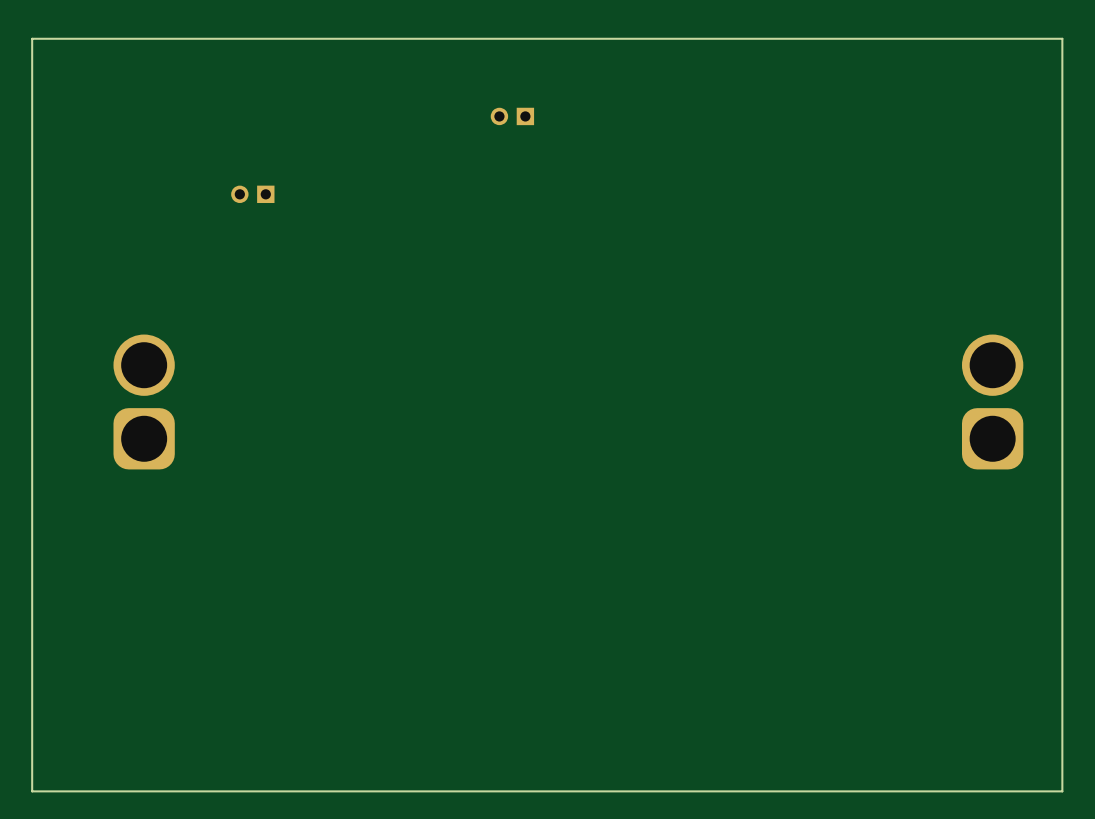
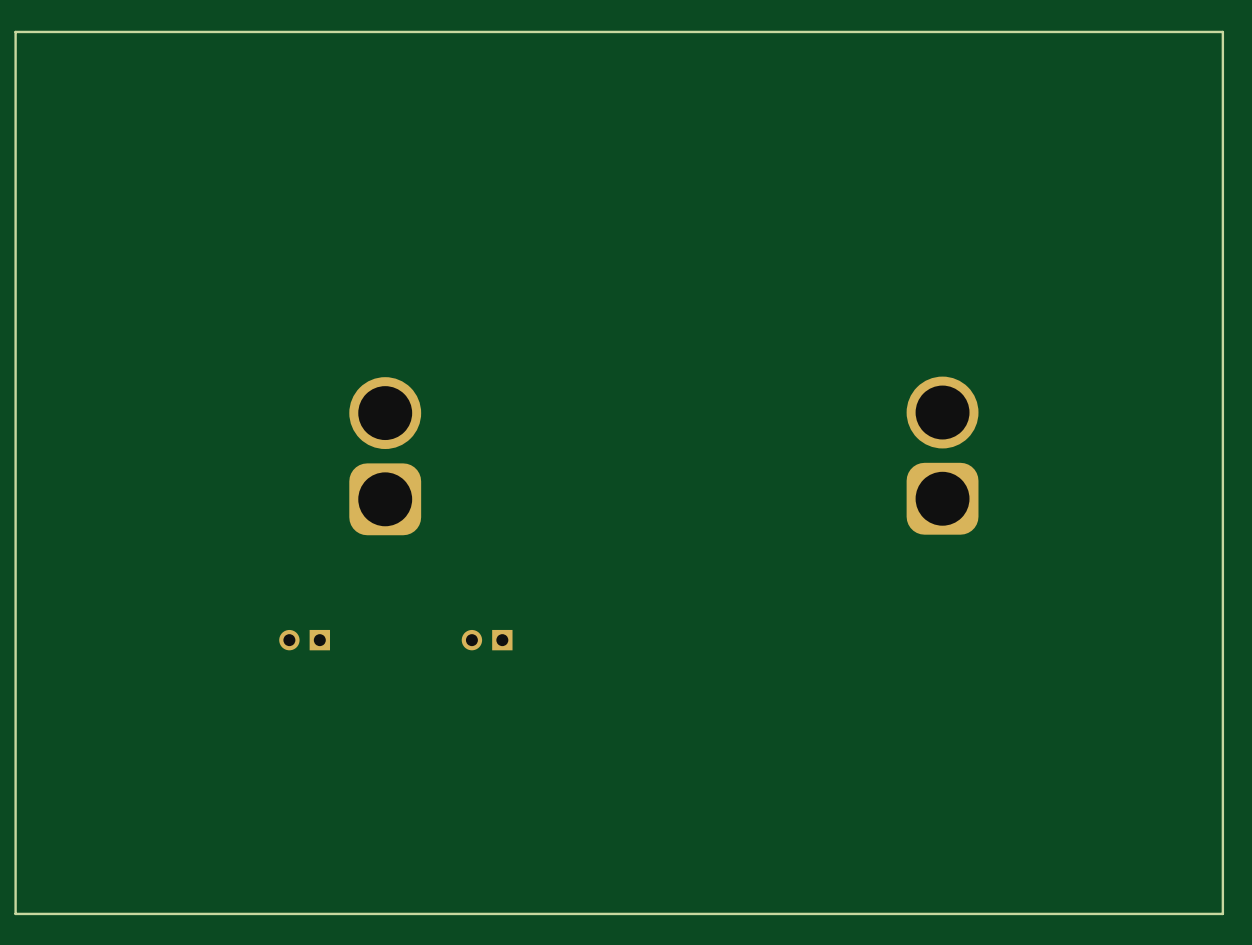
part: (512, 116) -> none
part: (252, 194) -> none
part position: (144, 401) -> (385, 456)
part position: (992, 401) -> (942, 455)
part: none -> (304, 640)
part: none -> (487, 640)

